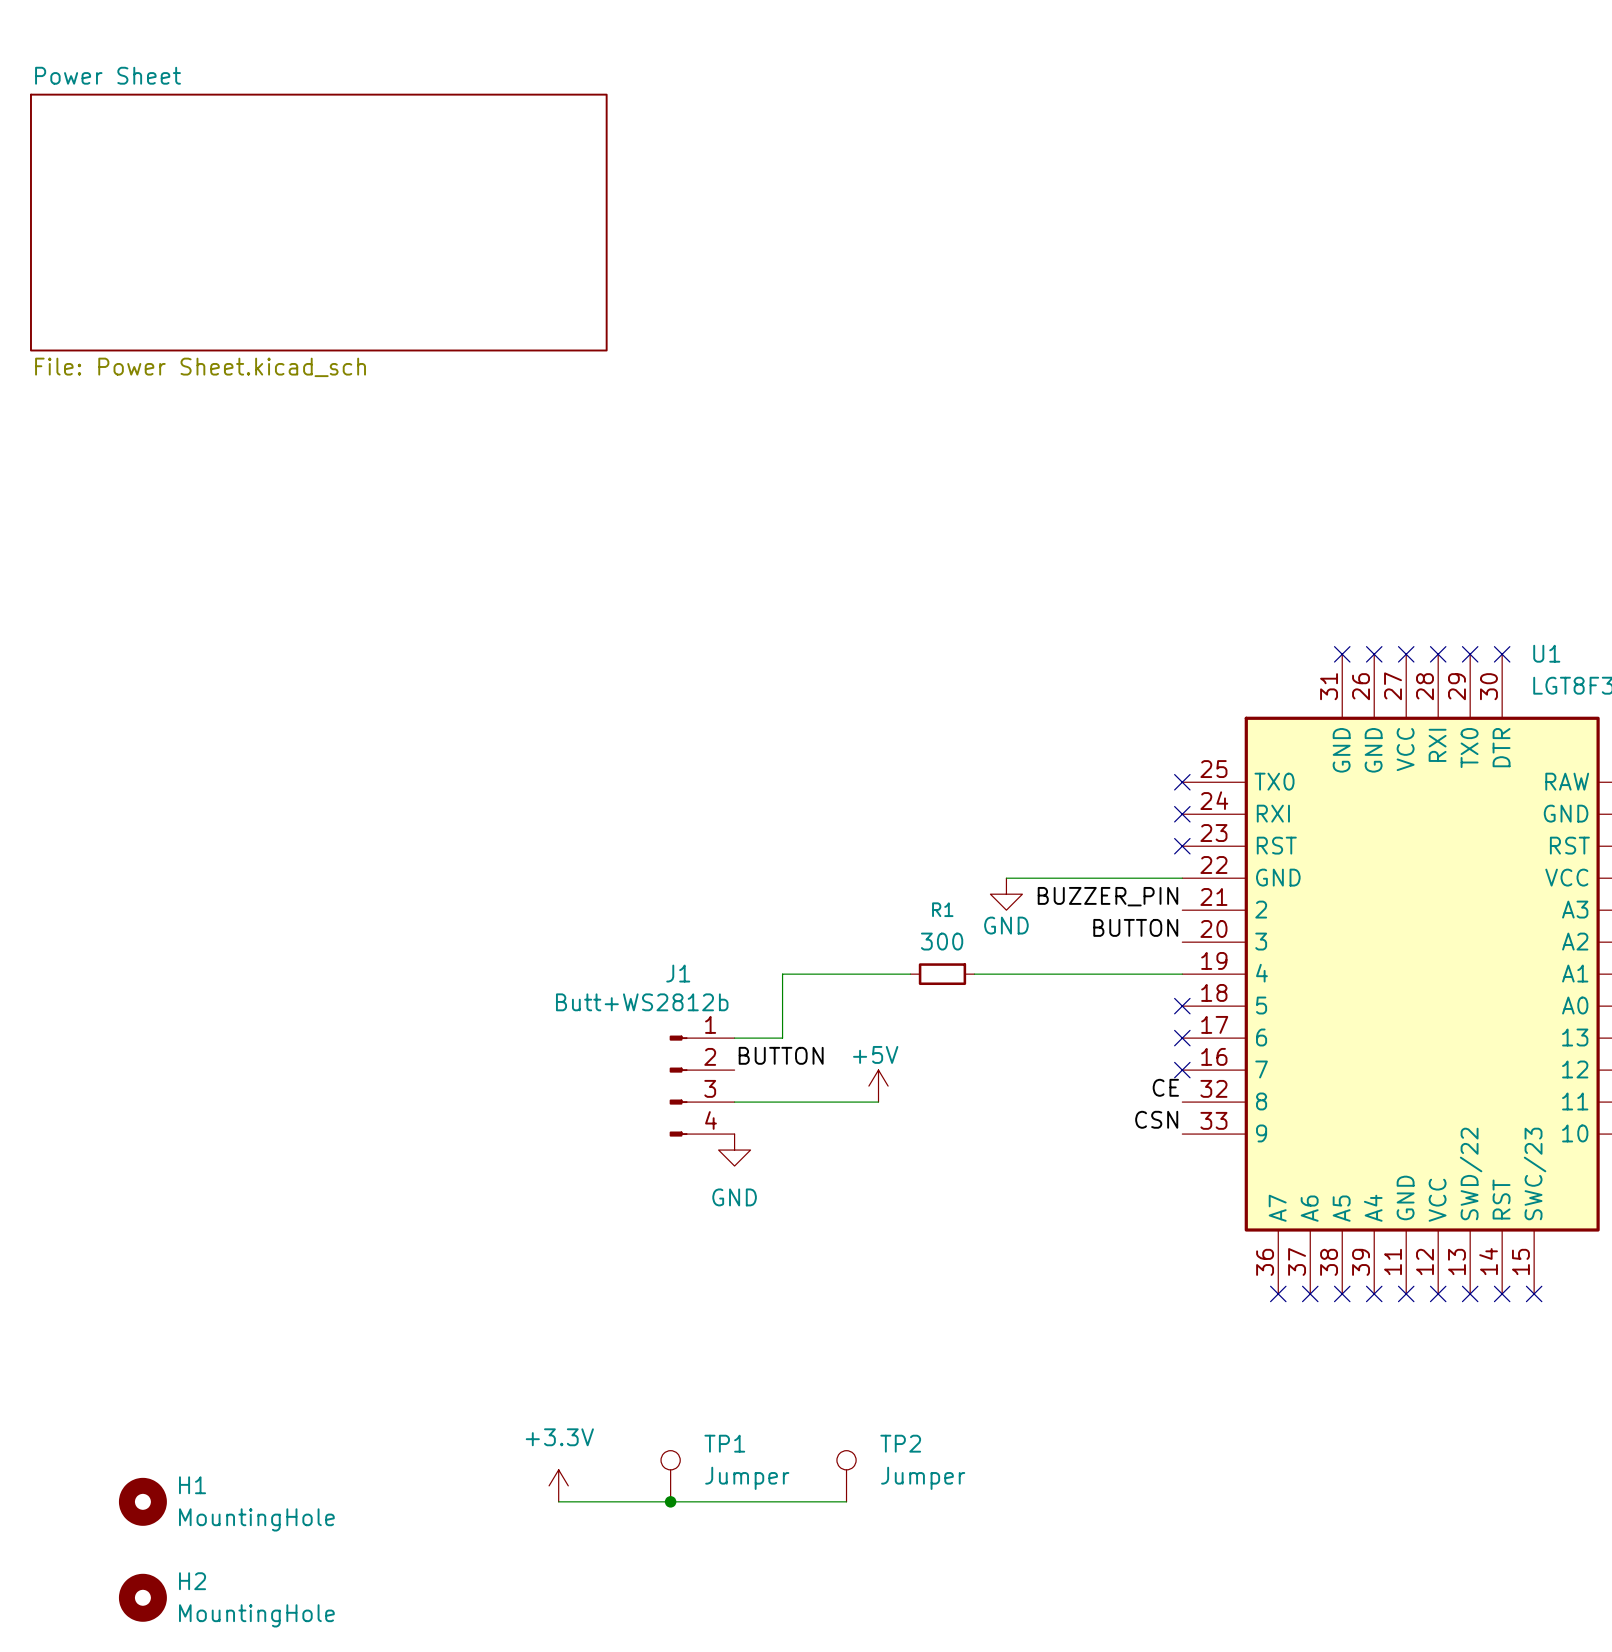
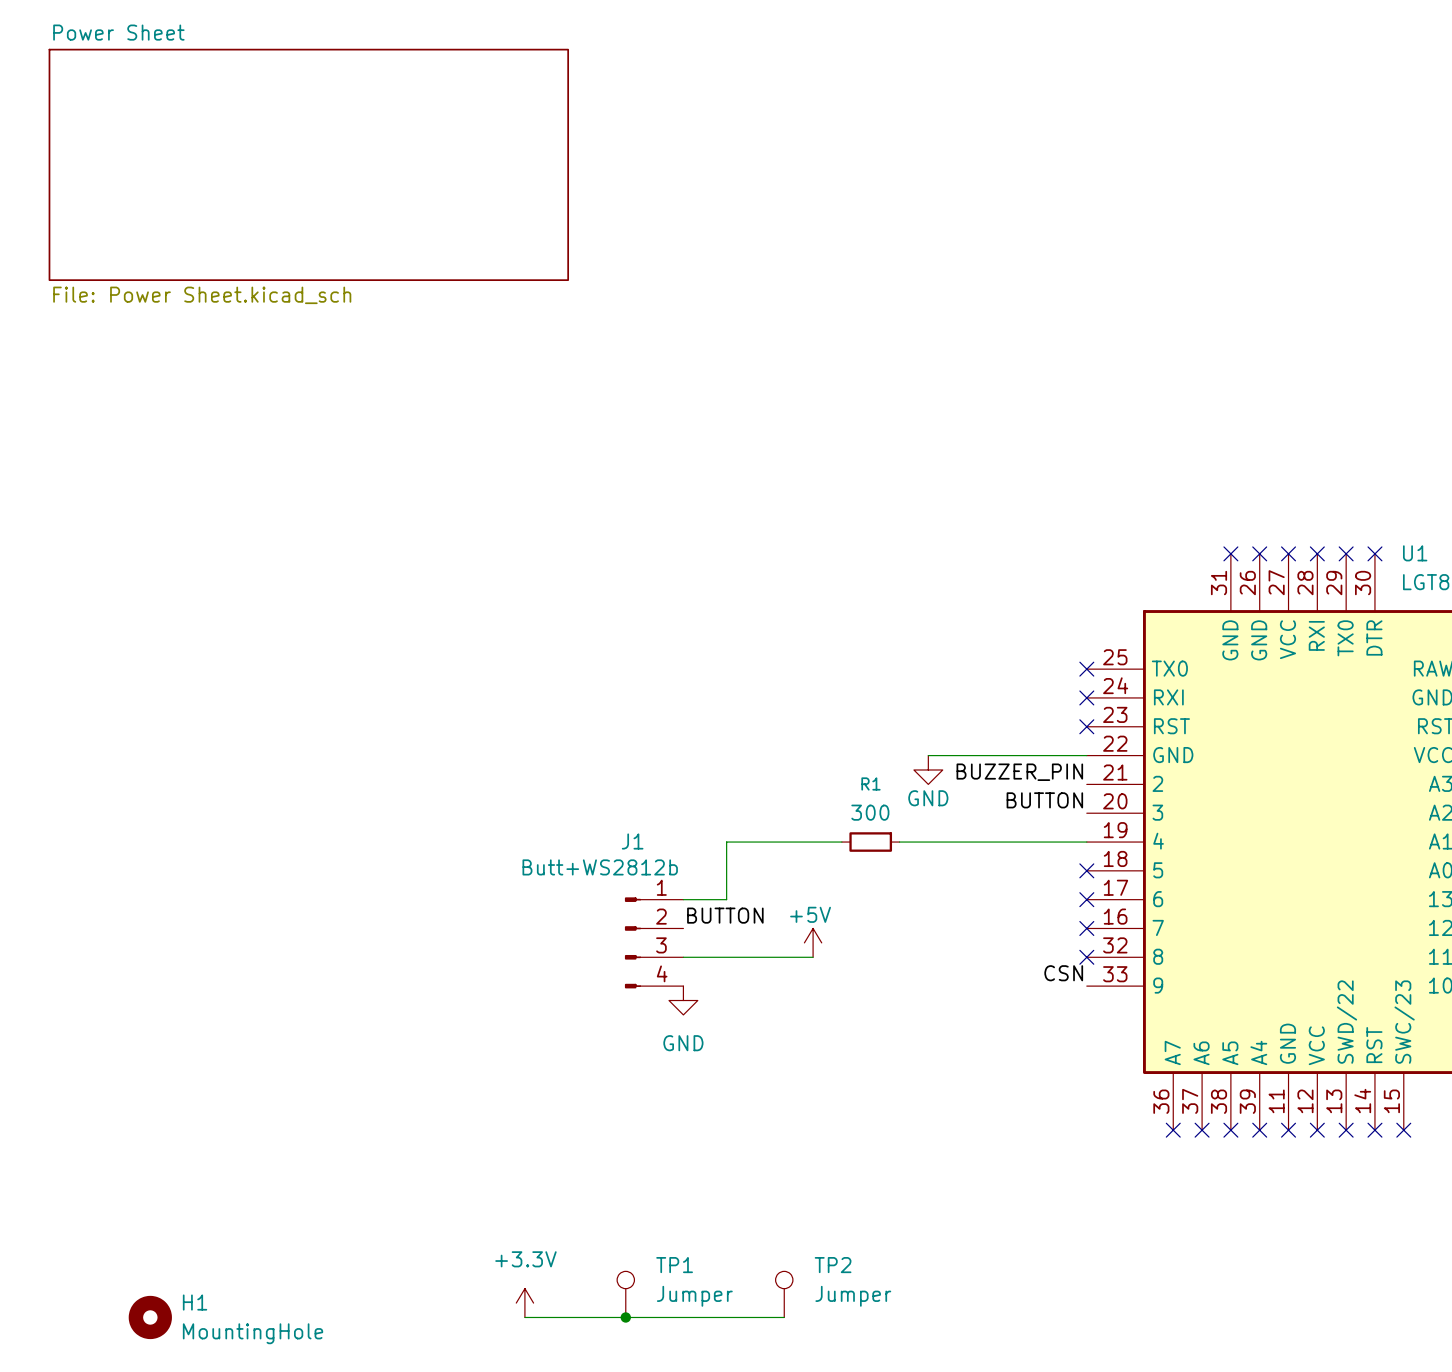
label: CE (1165, 1087) -> none
no-connect mark: none -> (1086, 957)

